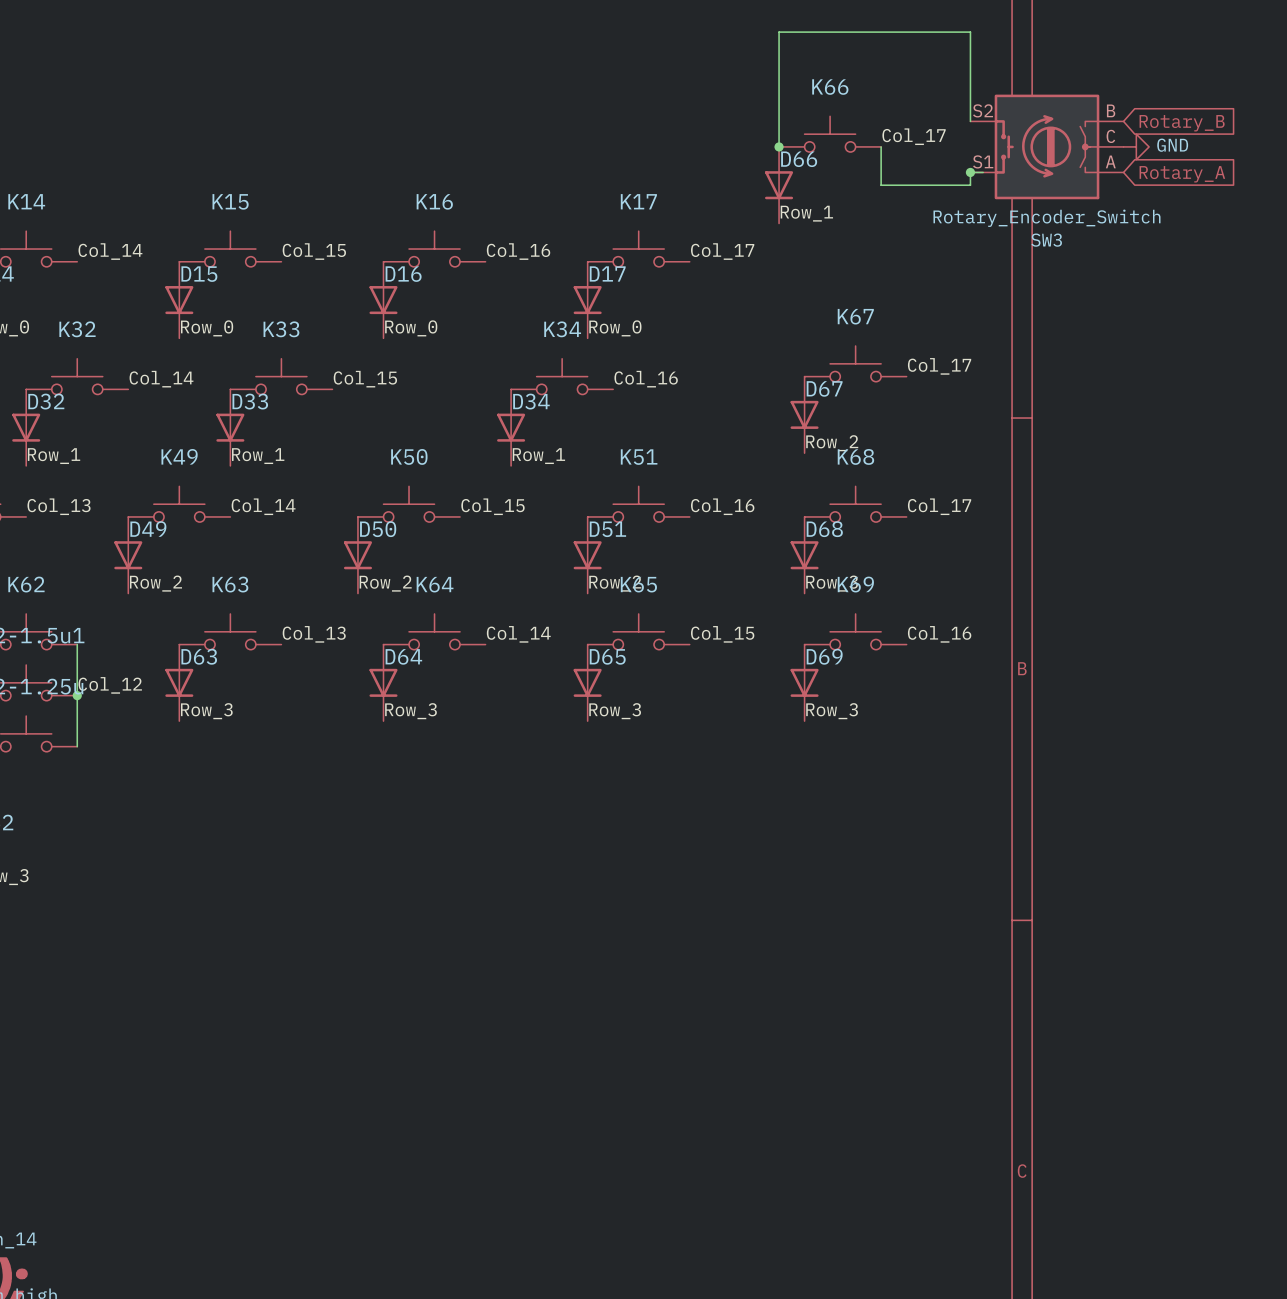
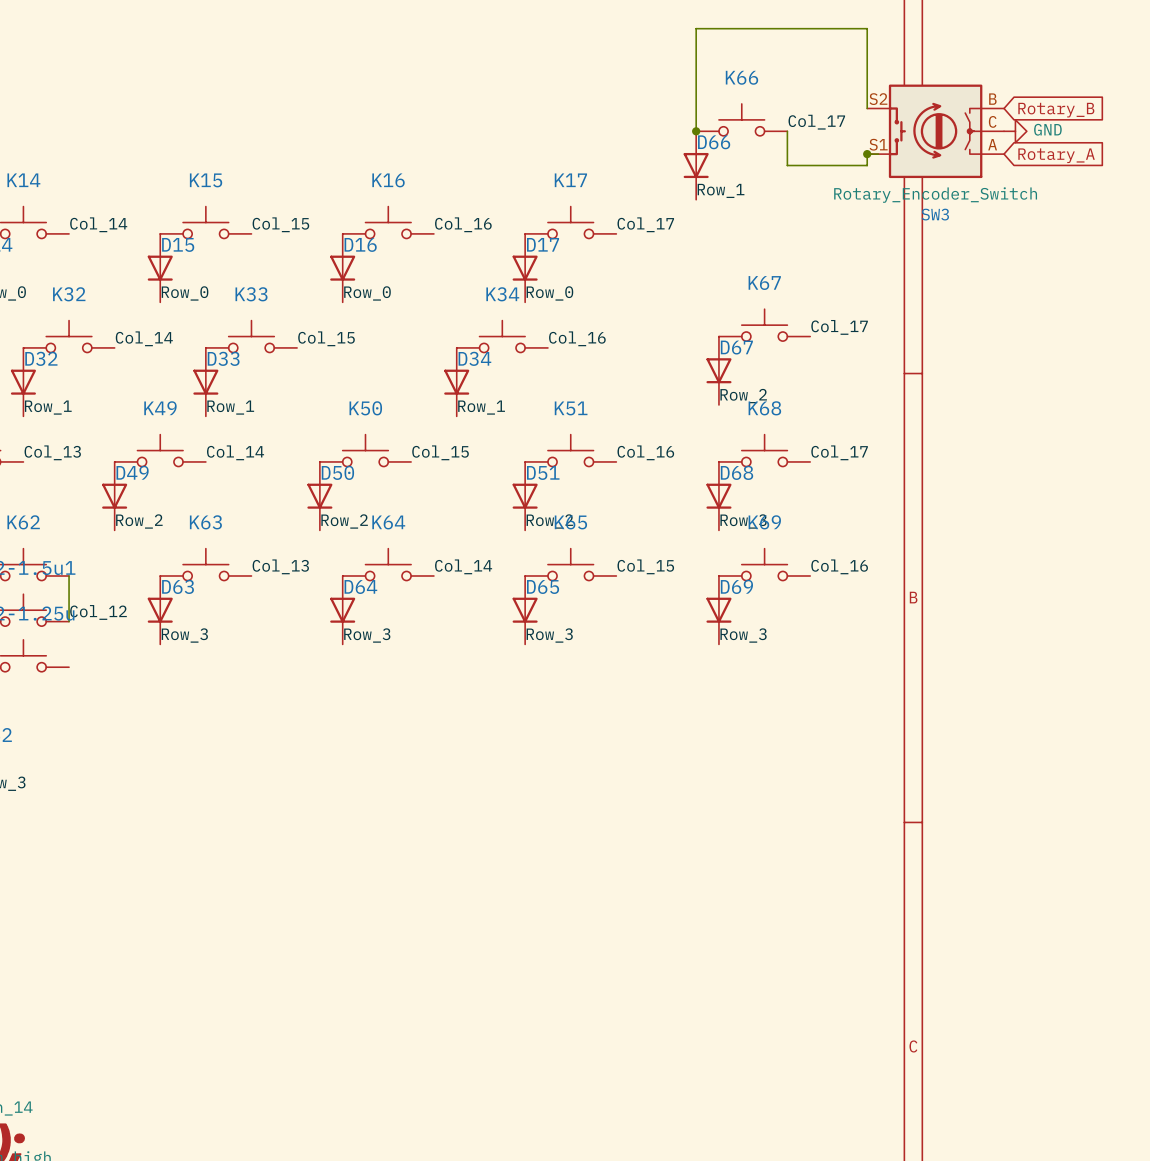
wire: (77, 695) (77, 746) -> none
junction: (77, 695) -> none

